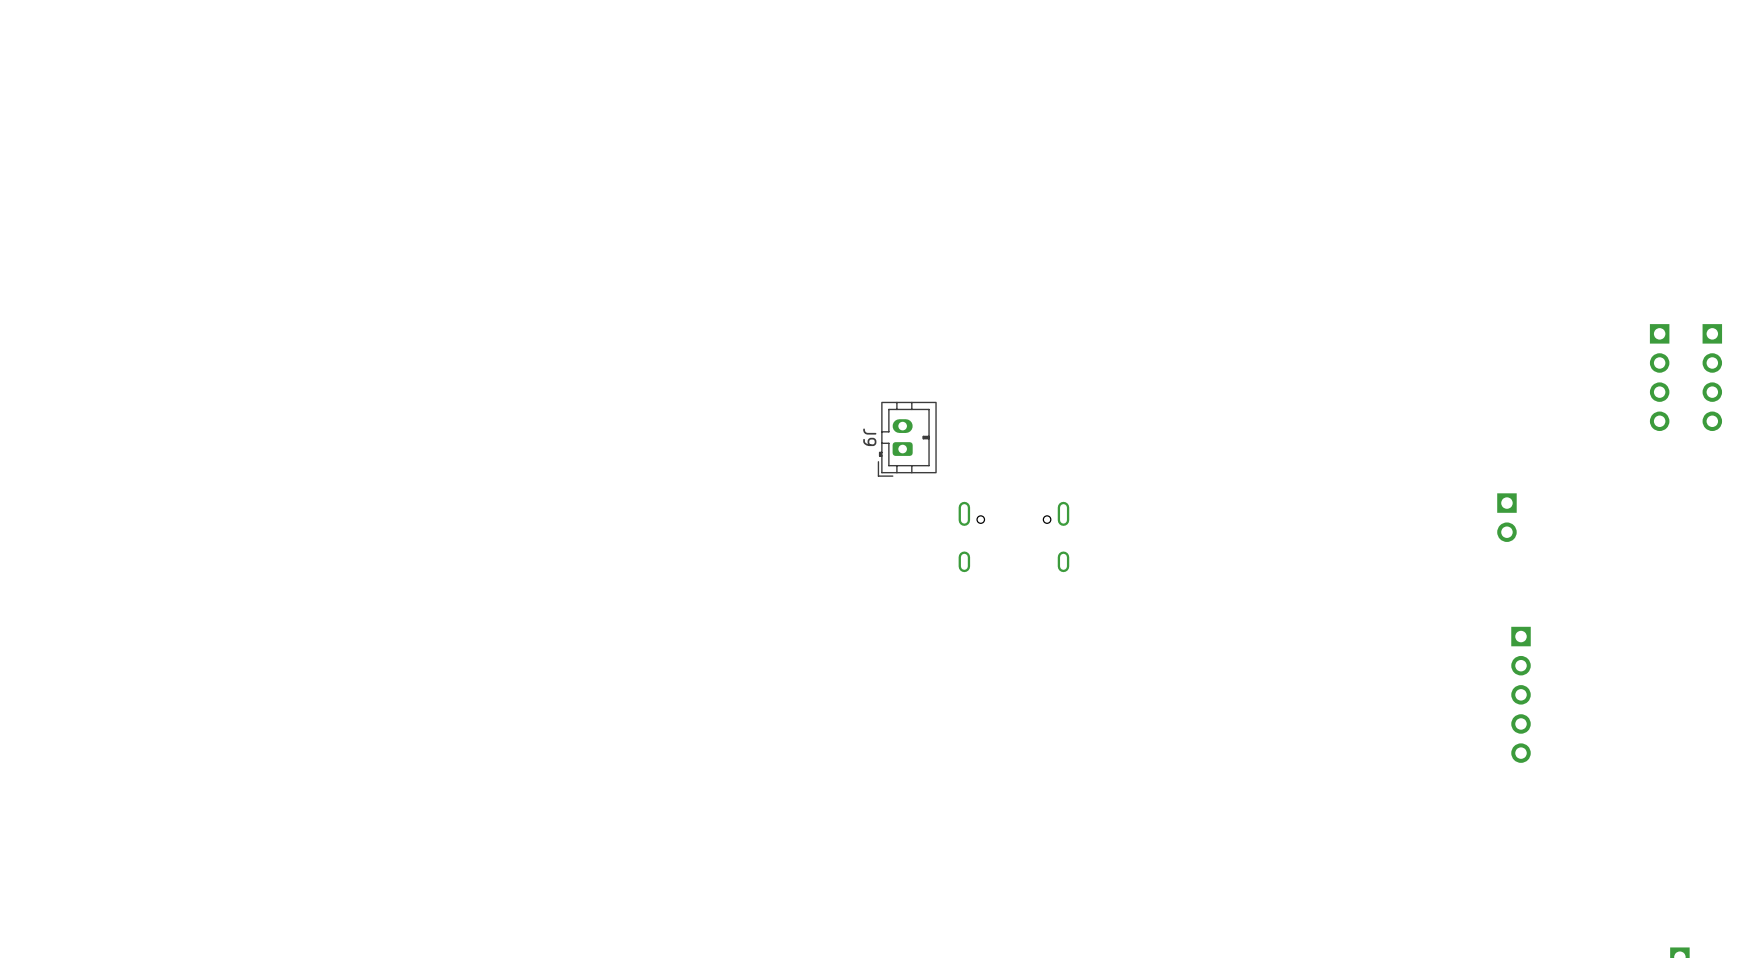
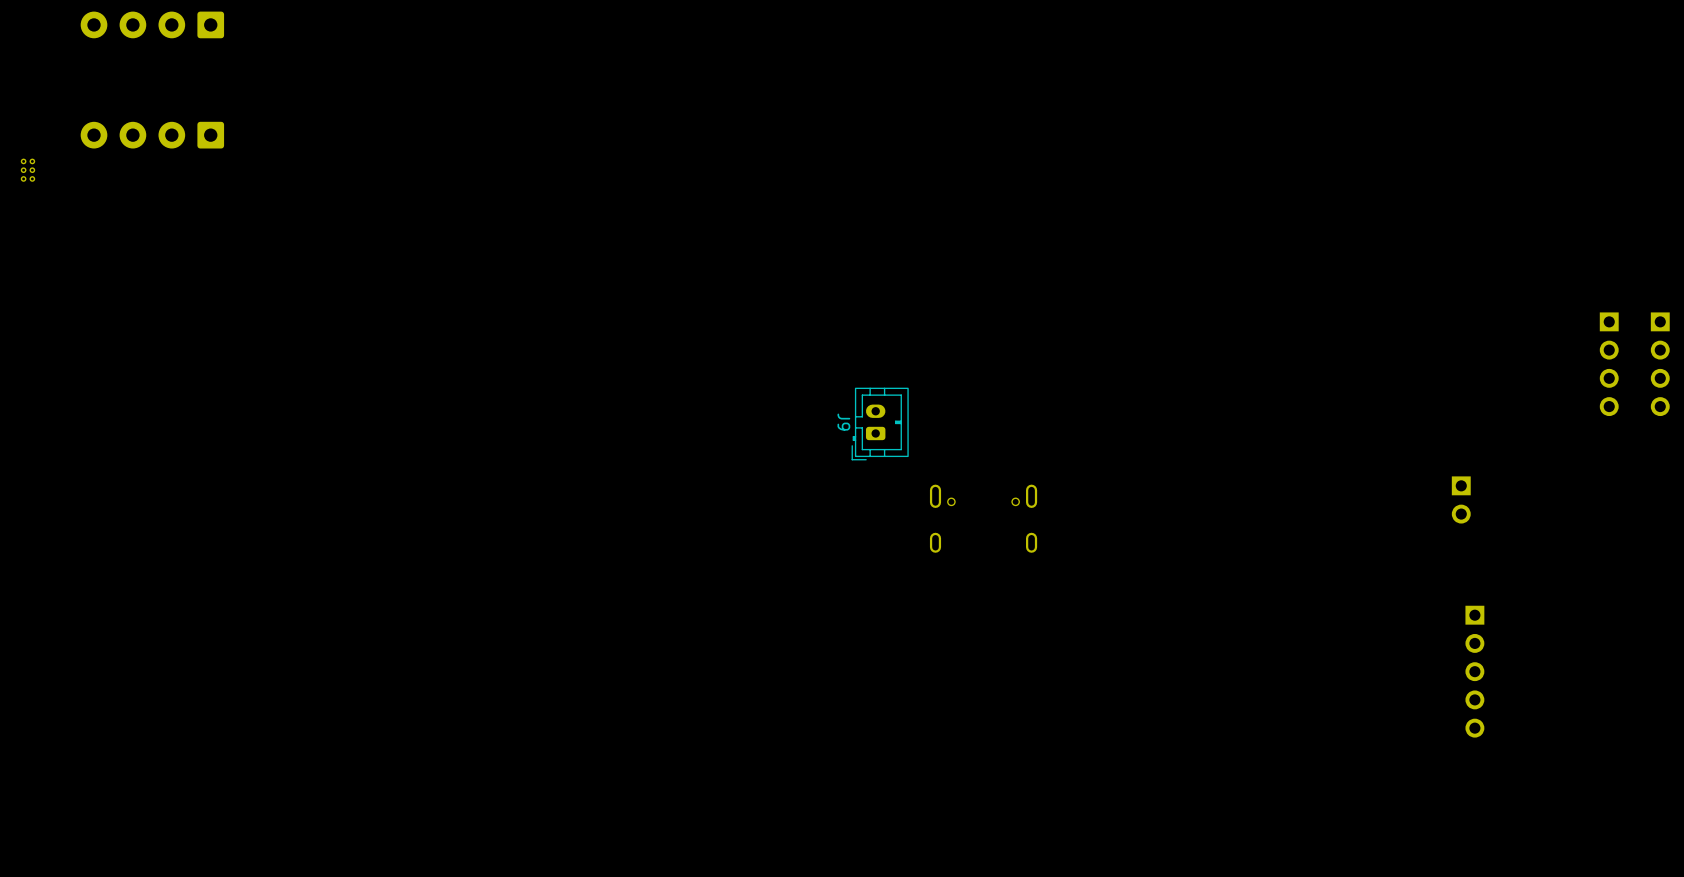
part: none -> (152, 24)
part: none -> (152, 135)
part: none -> (27, 170)

